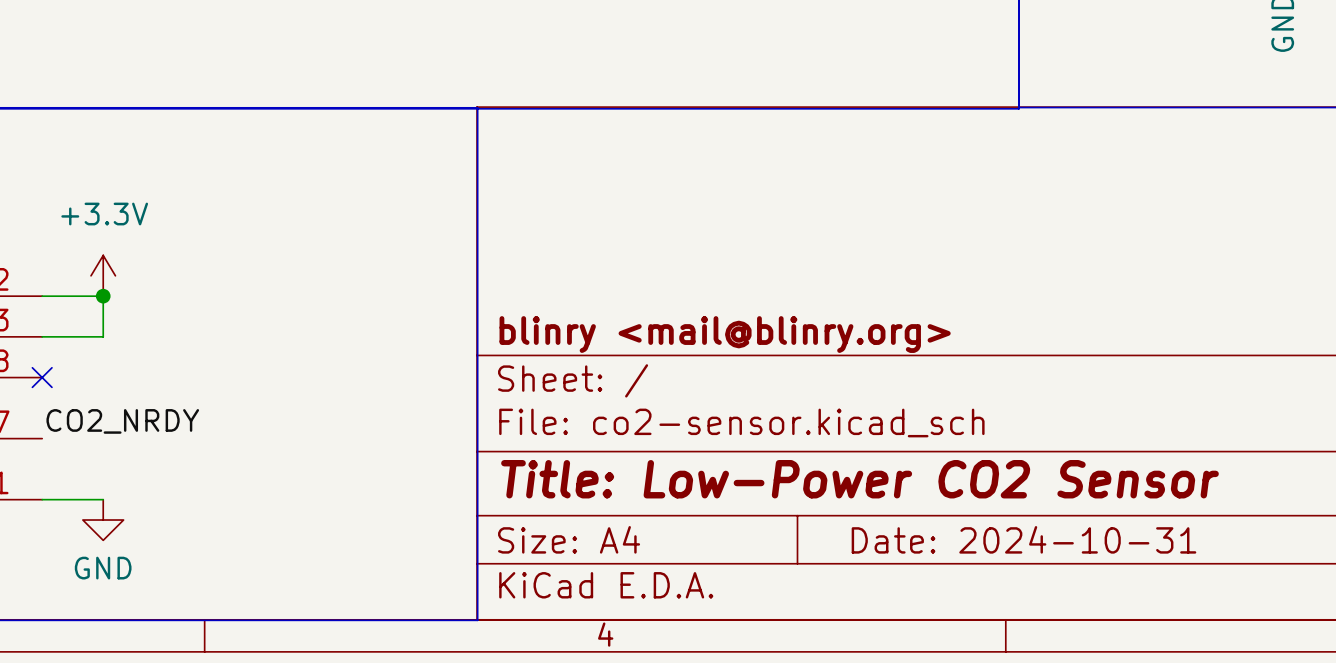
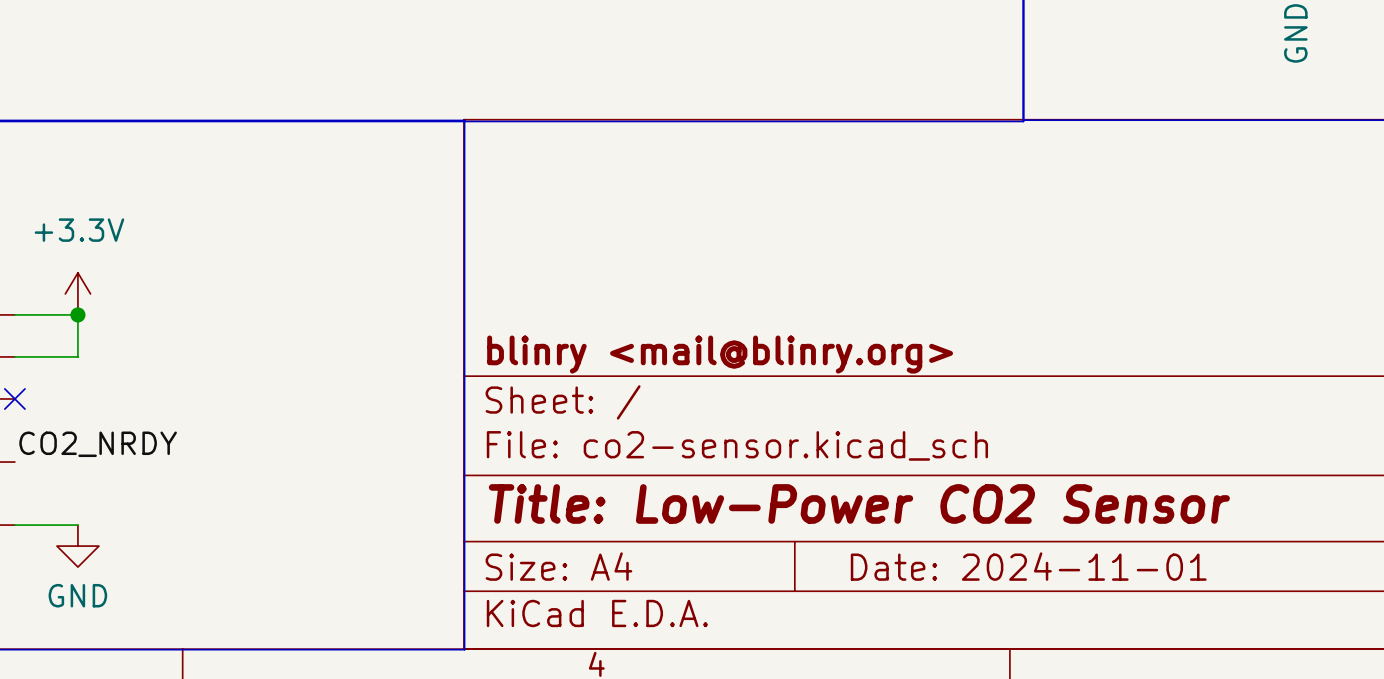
title block: Date: 2024-10-31 (1023, 539) -> Date: 2024-11-01 (1028, 566)

